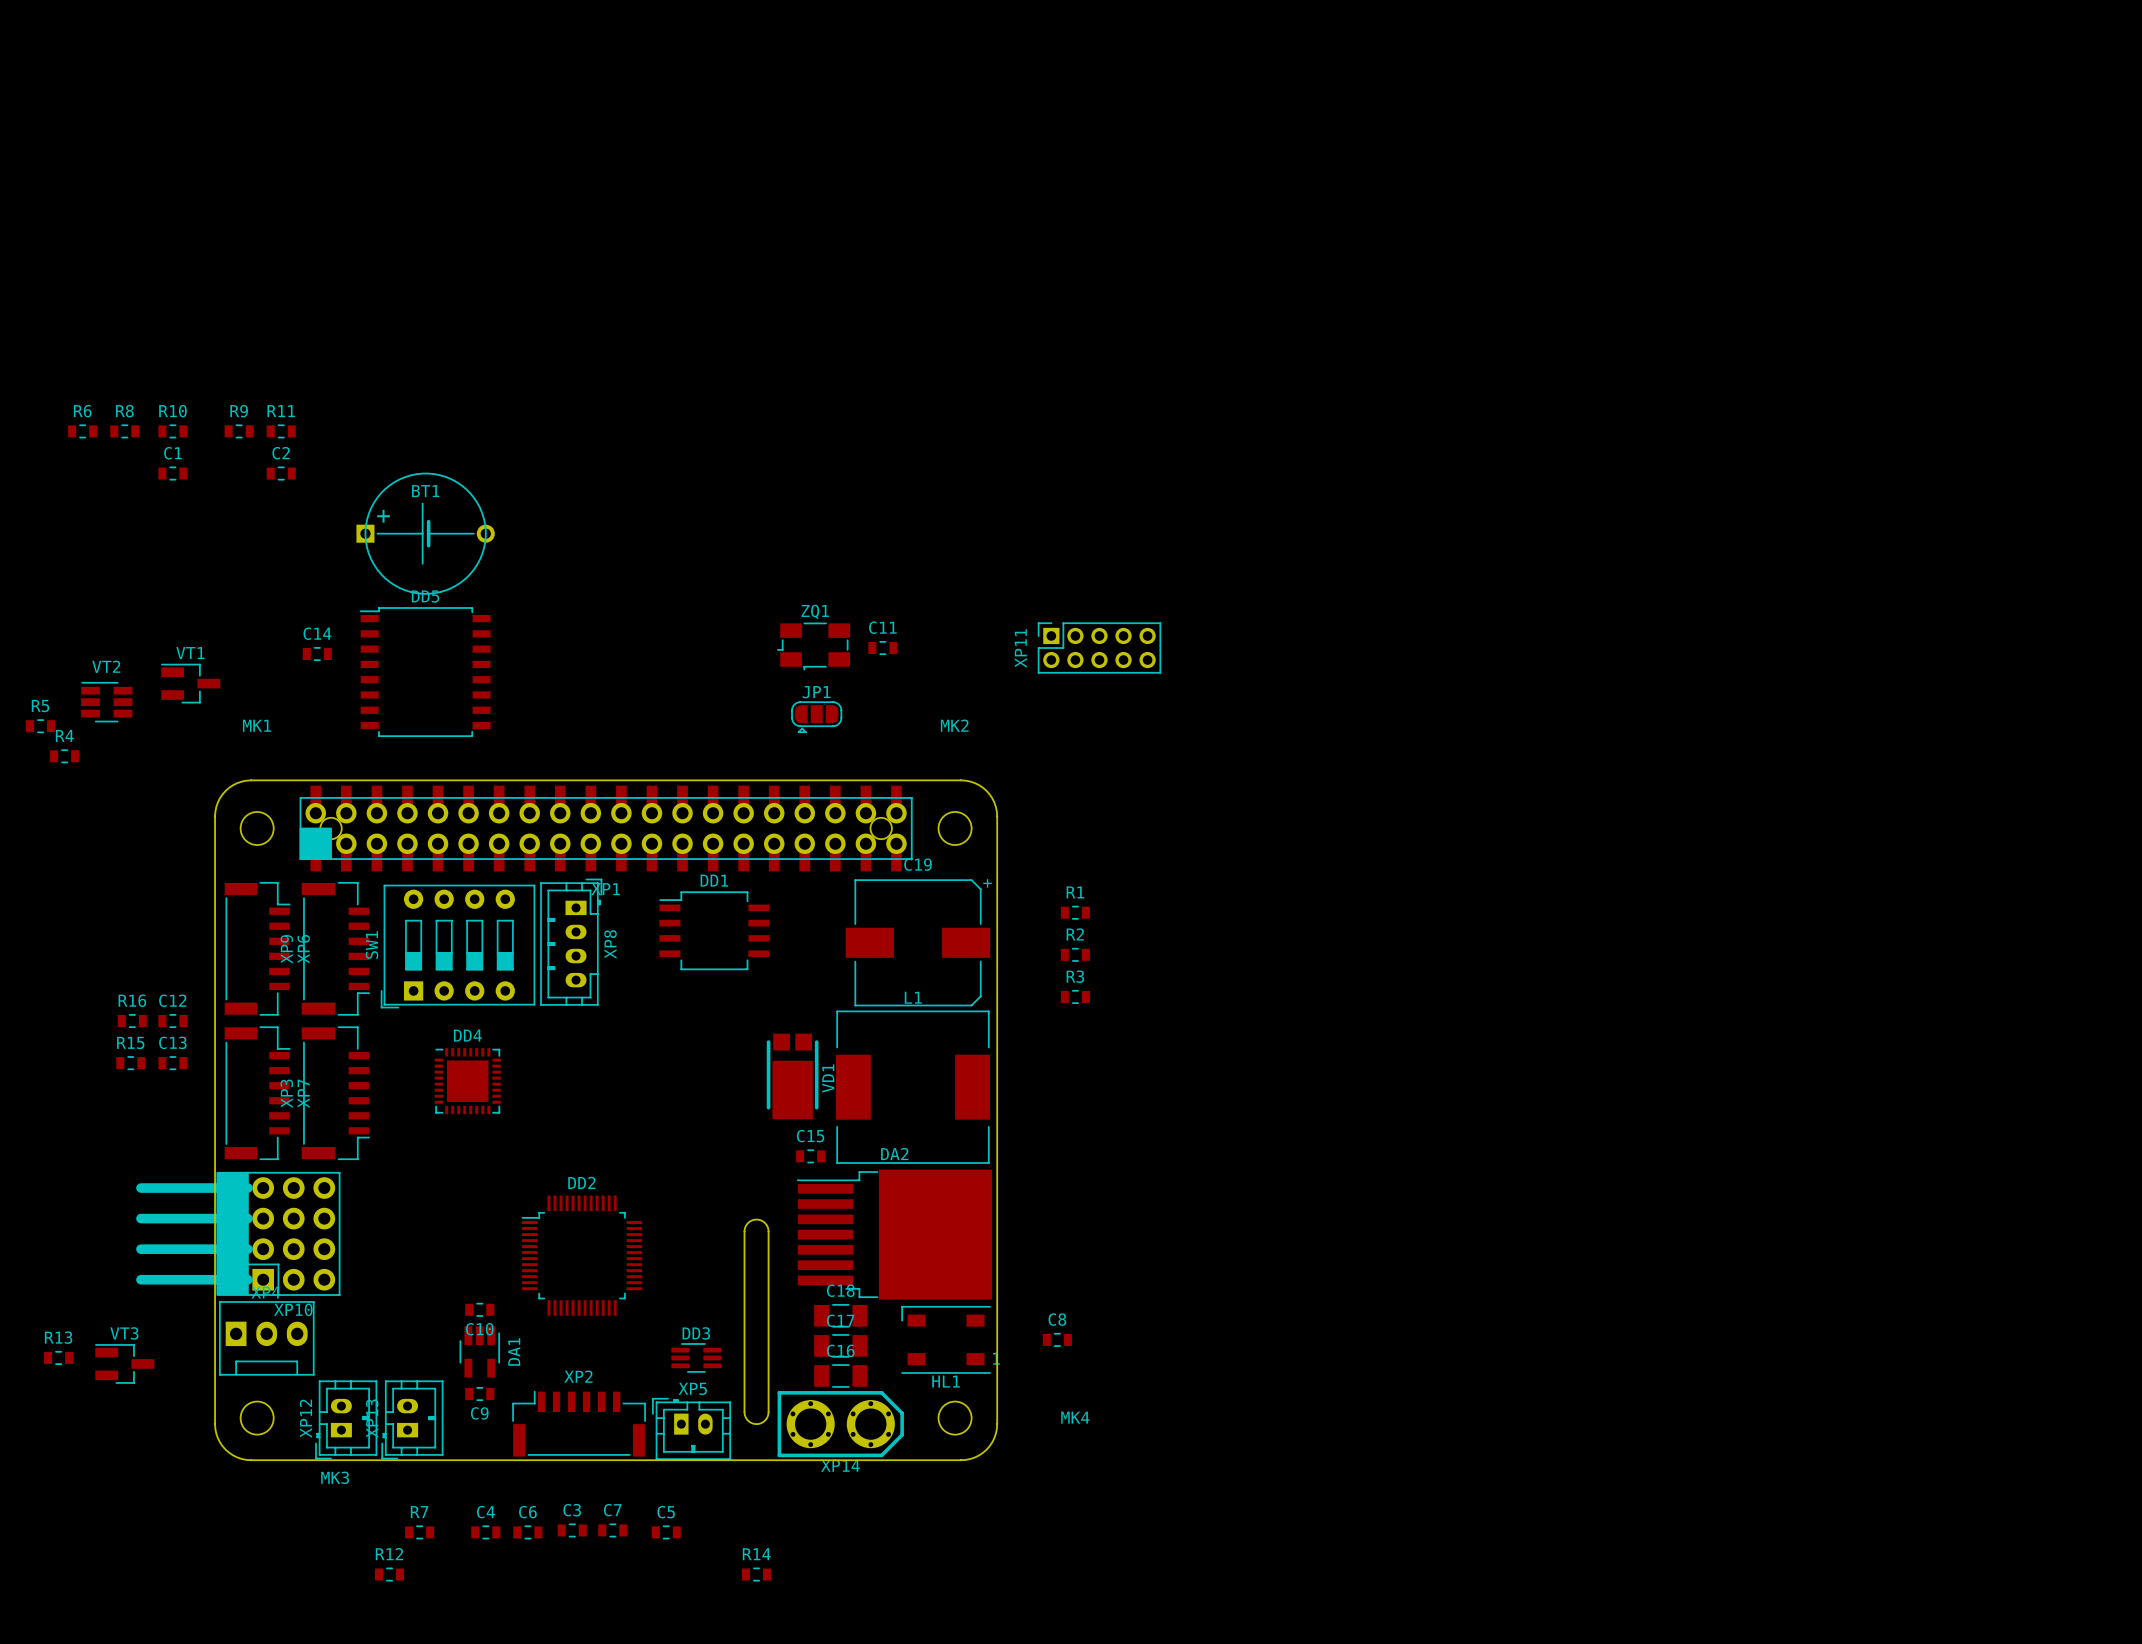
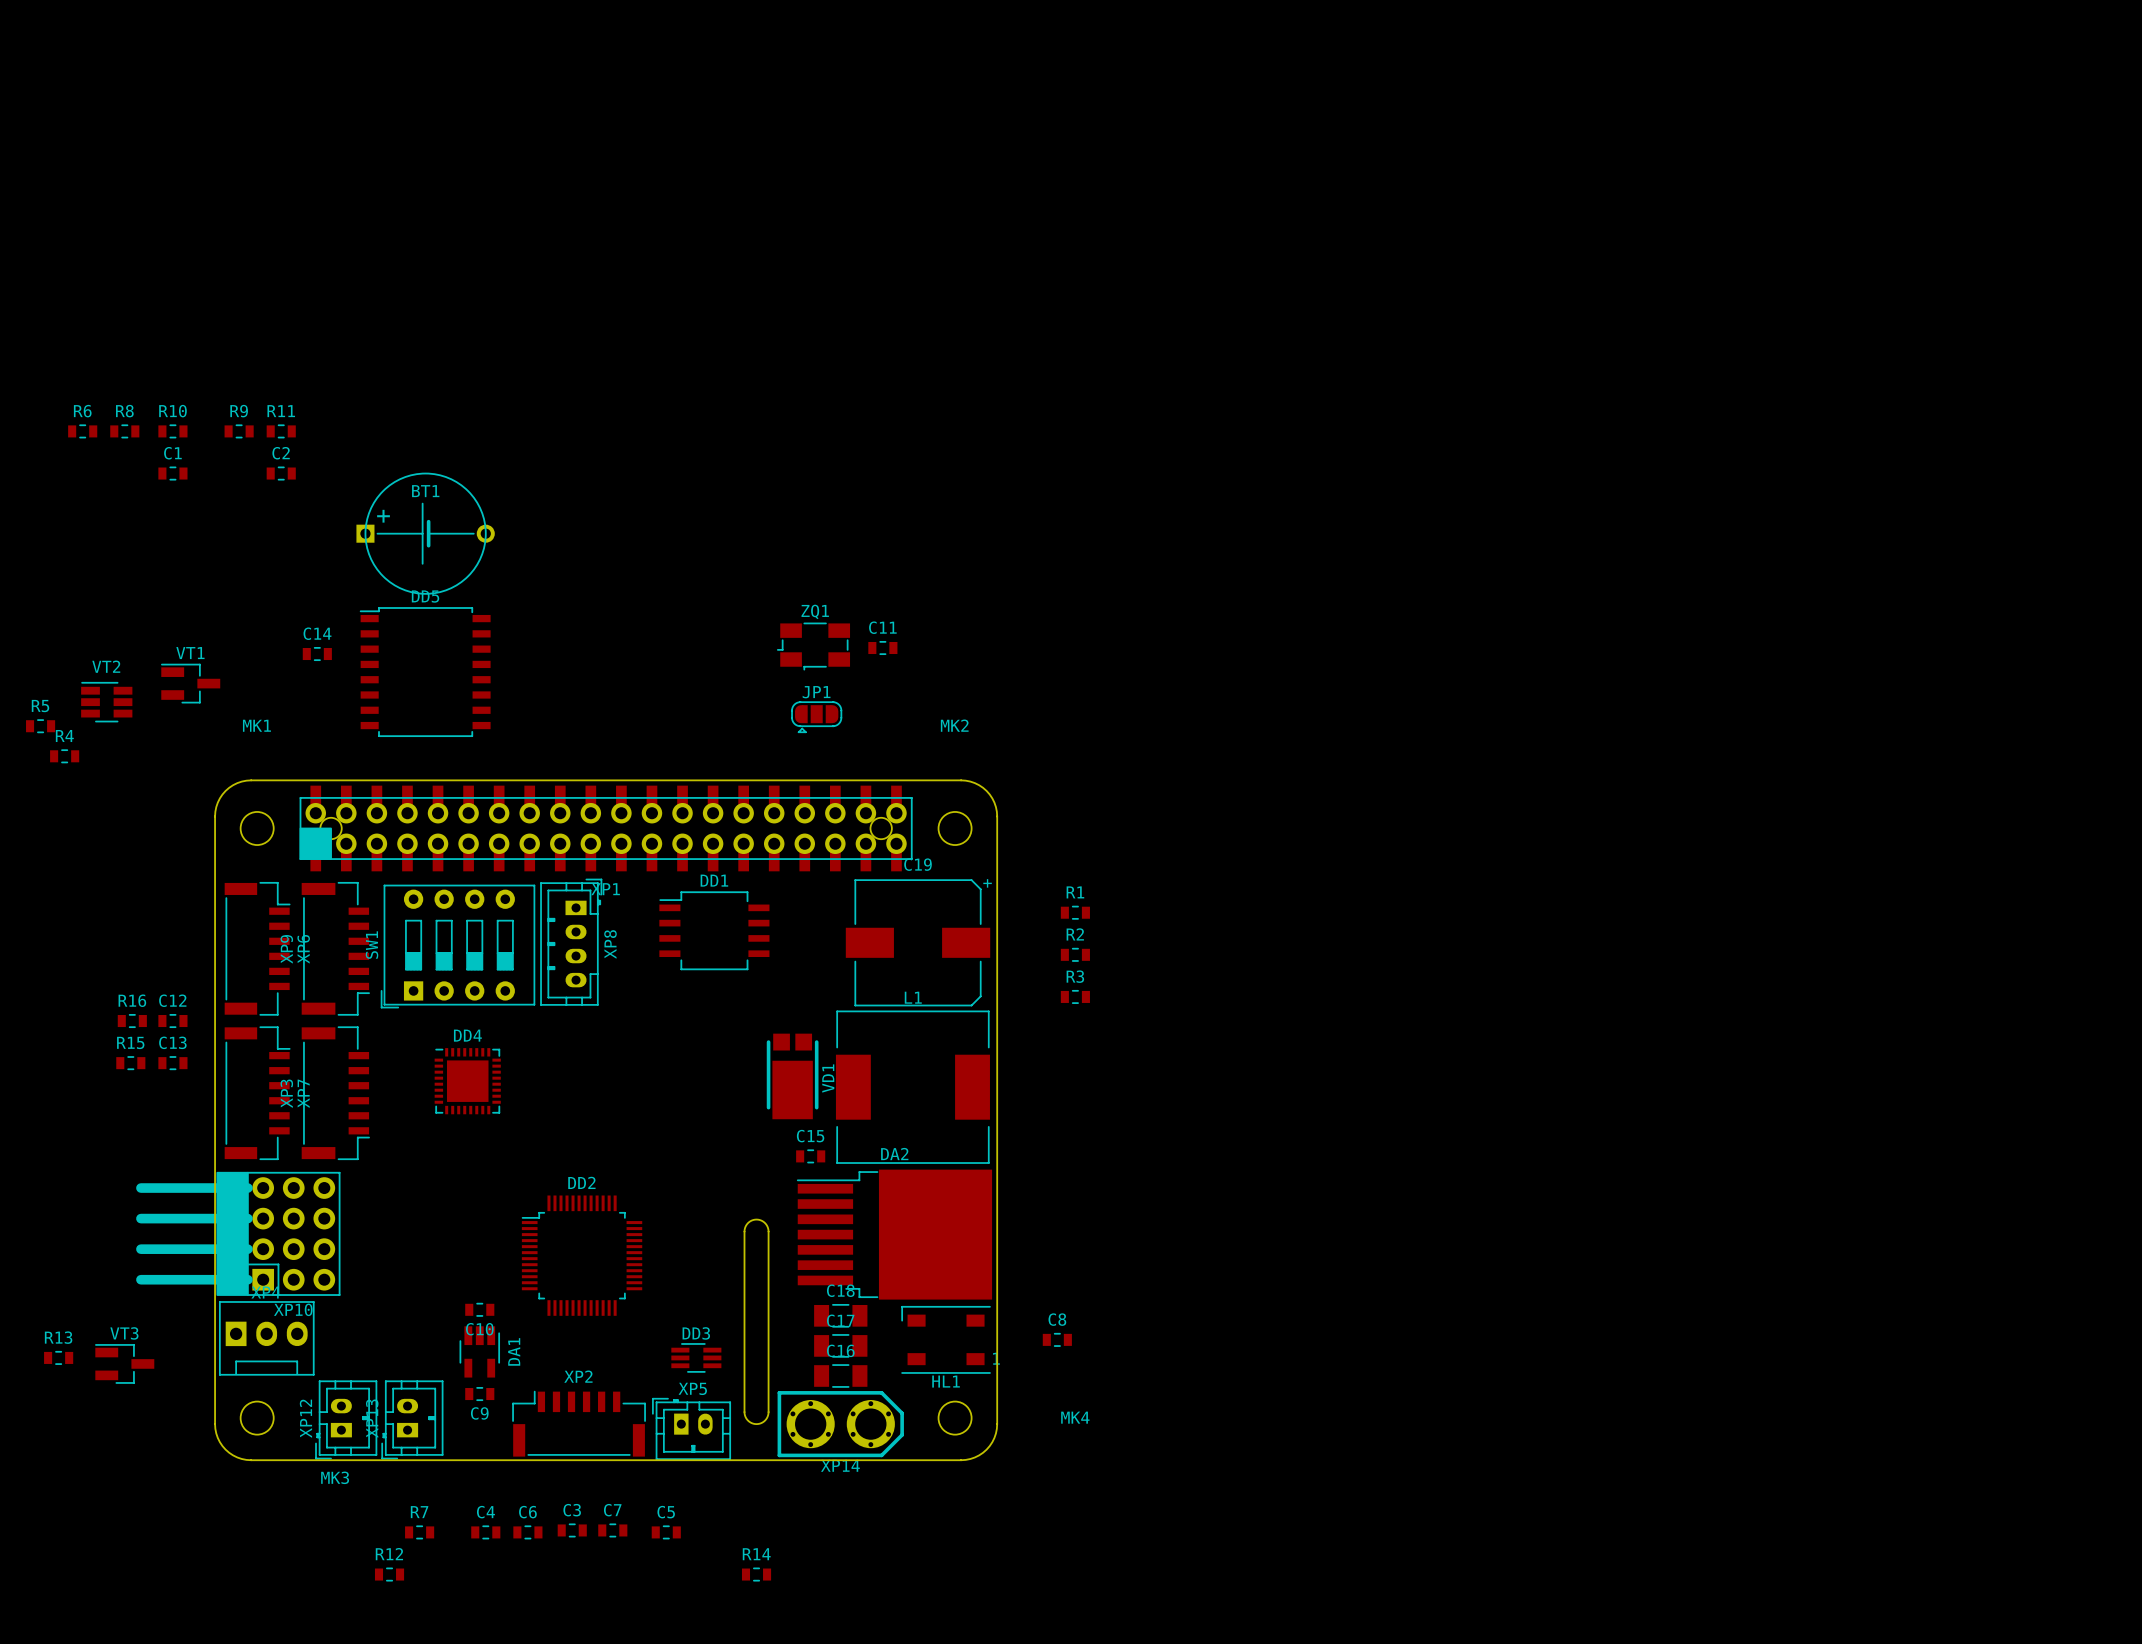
XP11: (1099, 648) -> none

